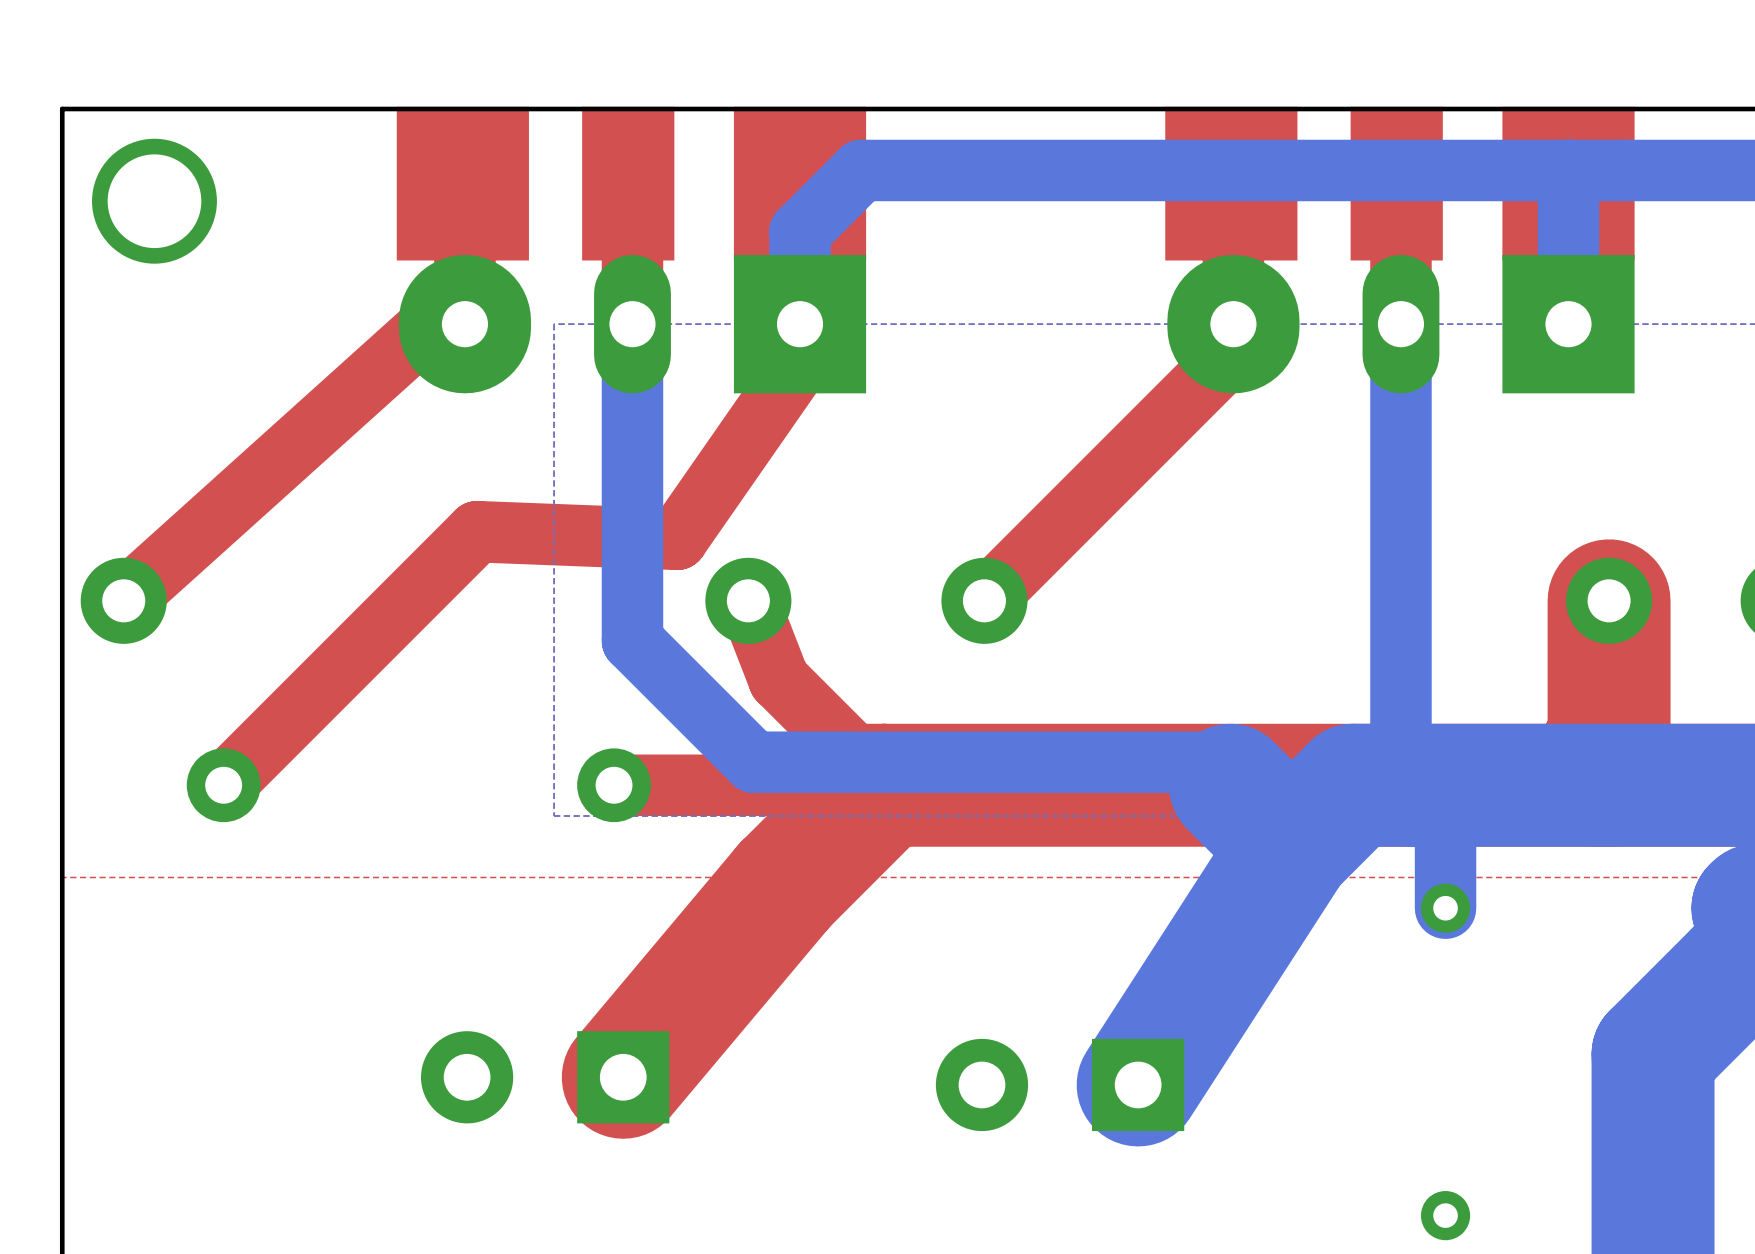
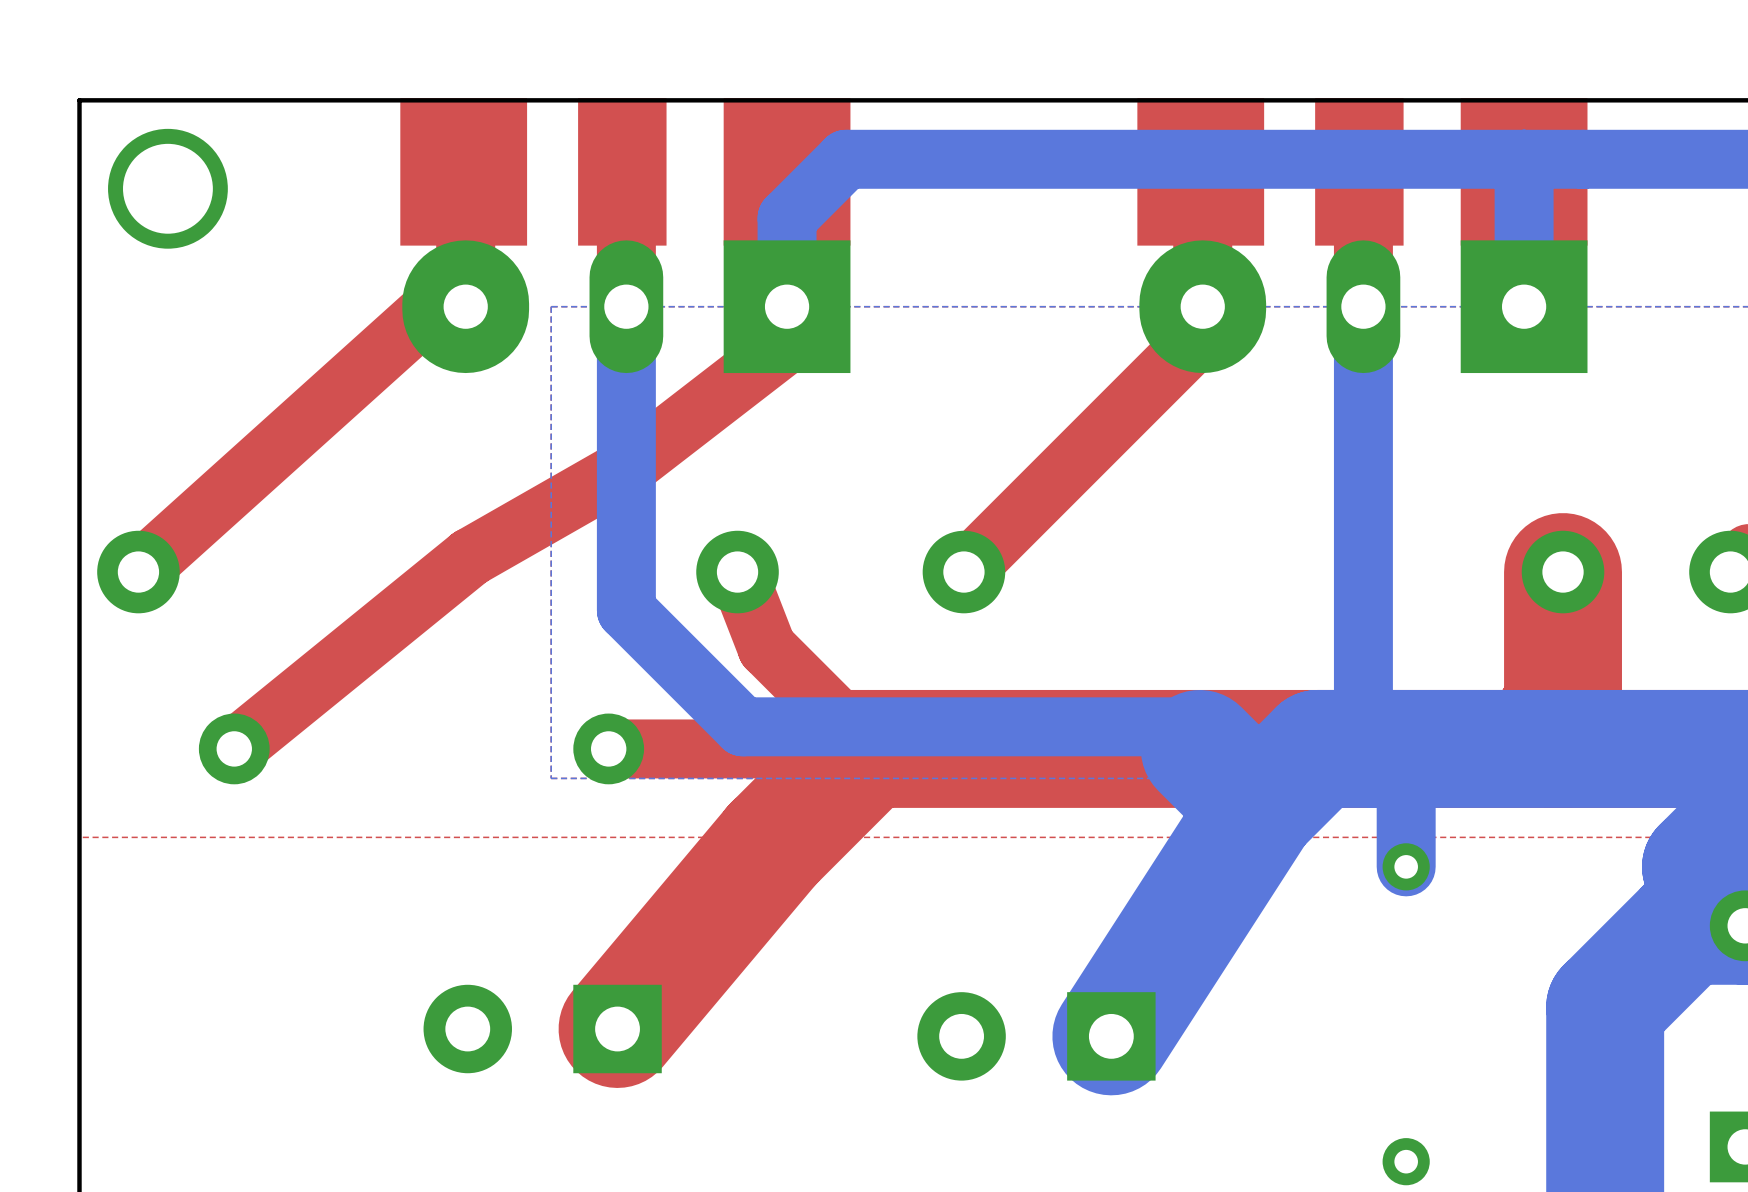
top track: (800, 362) (677, 539) (477, 531) (223, 785) -> (787, 343) (624, 468) (470, 557) (234, 748)

